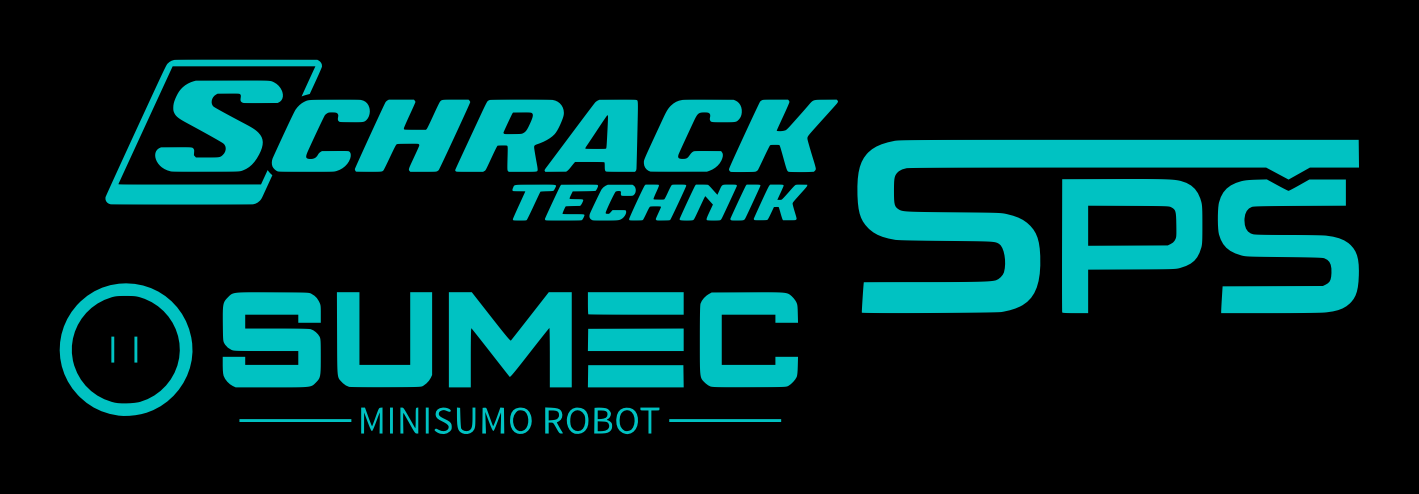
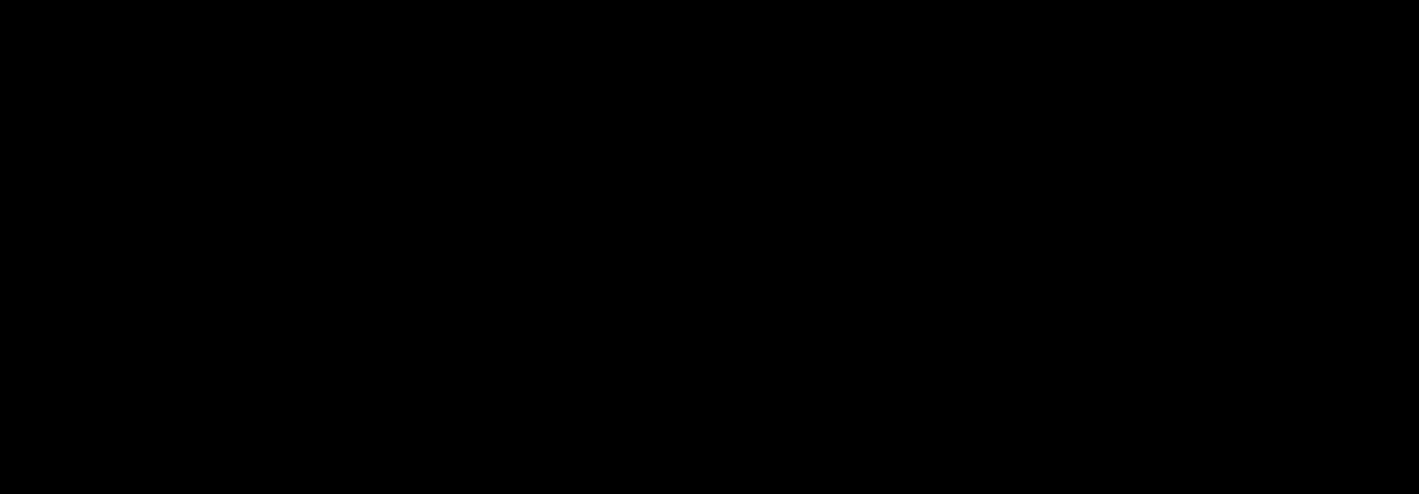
drawing: [105, 59, 1360, 314] -> none
drawing: [59, 283, 799, 435] -> none

